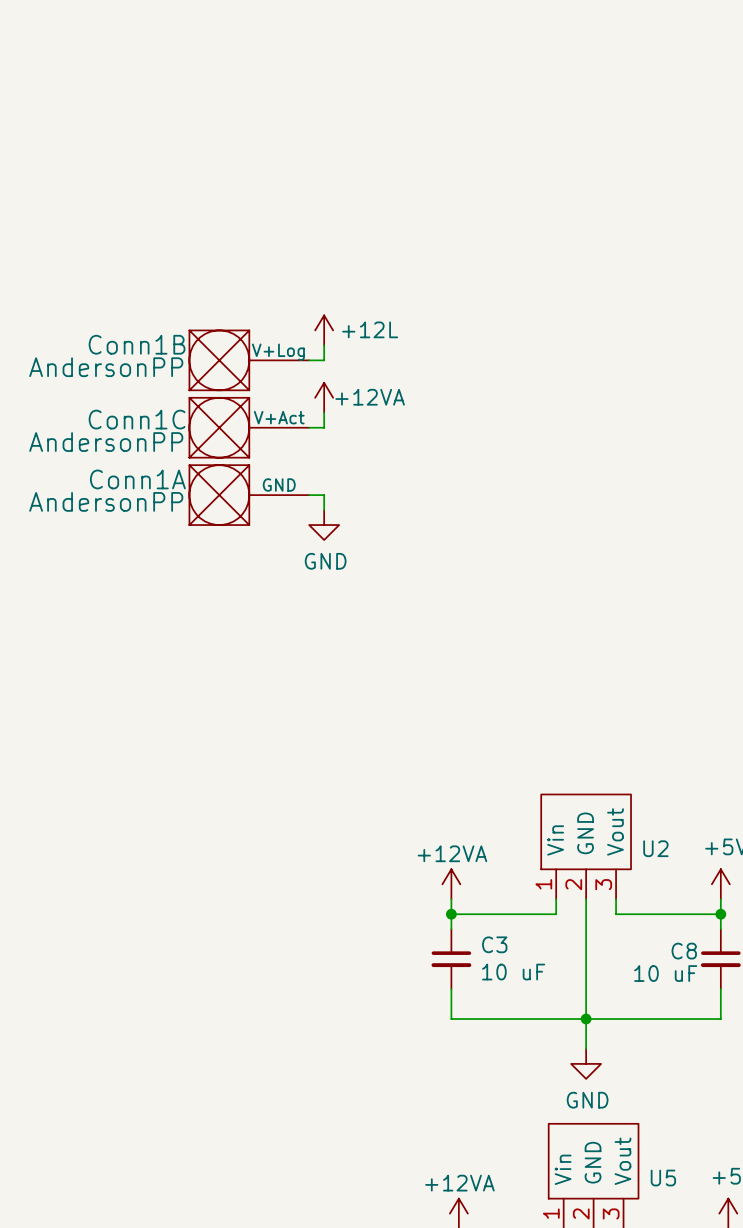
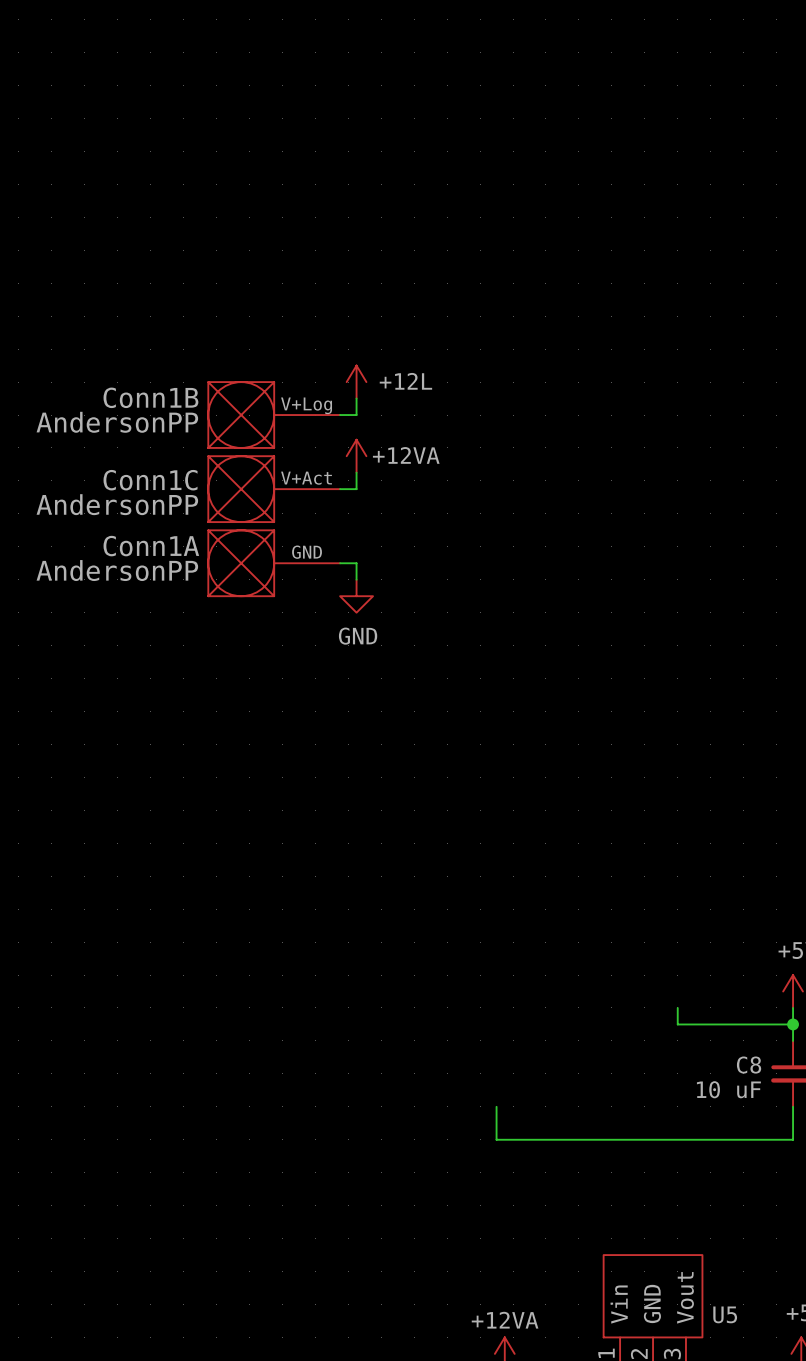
U2: (586, 846) -> none
power symbol: +12VA (451, 884) -> none
wire: (451, 899) (451, 929) -> none
wire: (556, 899) (556, 914) (451, 914) -> none
wire: (586, 899) (586, 1048) -> none
junction: (451, 914) -> none
C3: 10 uF (451, 959) -> none
junction: (586, 1019) -> none
power symbol: GND (586, 1063) -> none

